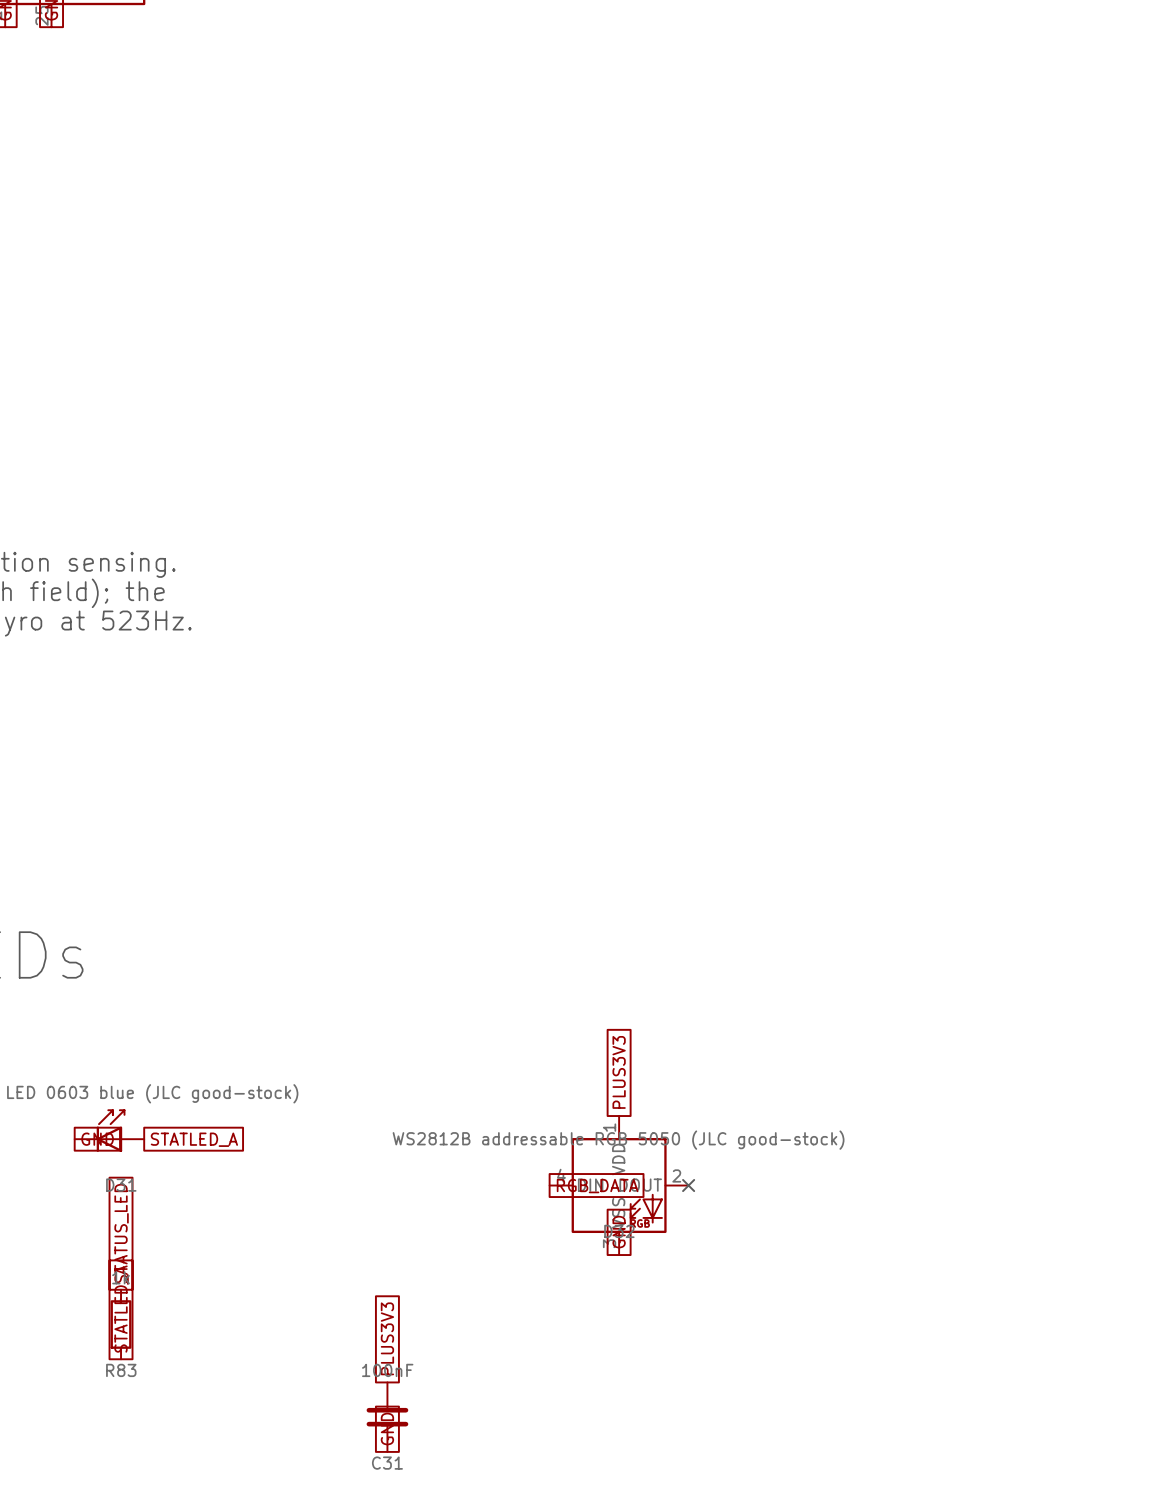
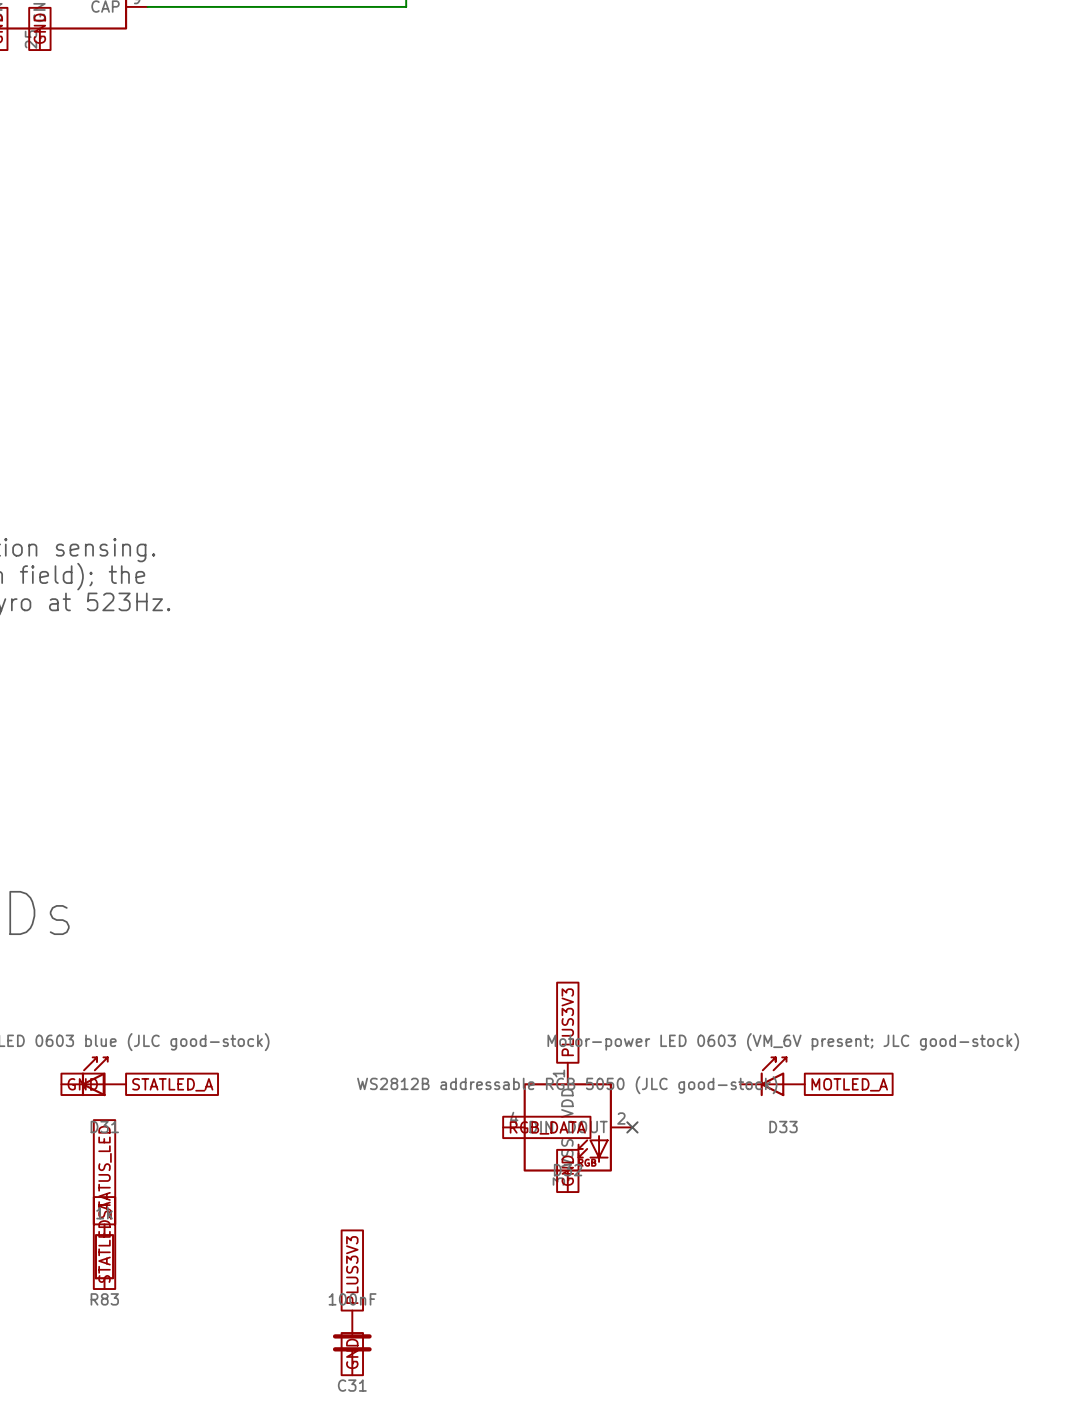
D33: none -> Motor-power LED 0603 (VM_6V present; JLC good-stock) (772, 1076)
global label: none -> MOTLED_A (849, 1084)

